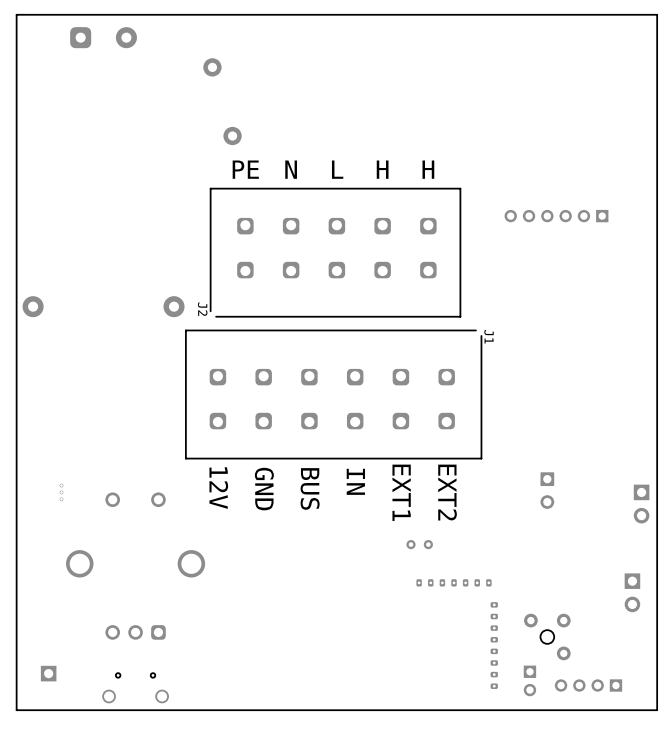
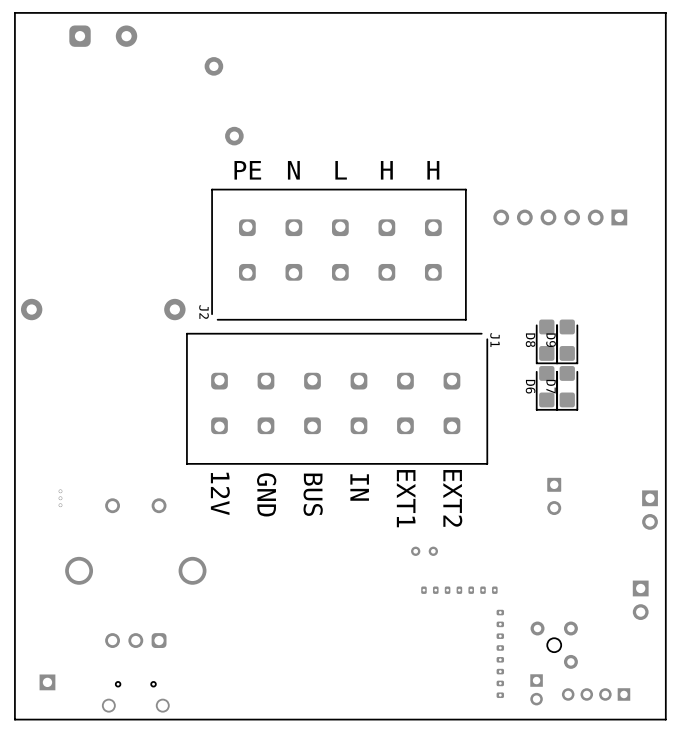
part footprint: [504, 209, 609, 223] -> [493, 209, 628, 226]
D8: none -> (546, 341)
D9: none -> (567, 341)
D6: none -> (546, 388)
D7: none -> (567, 388)

